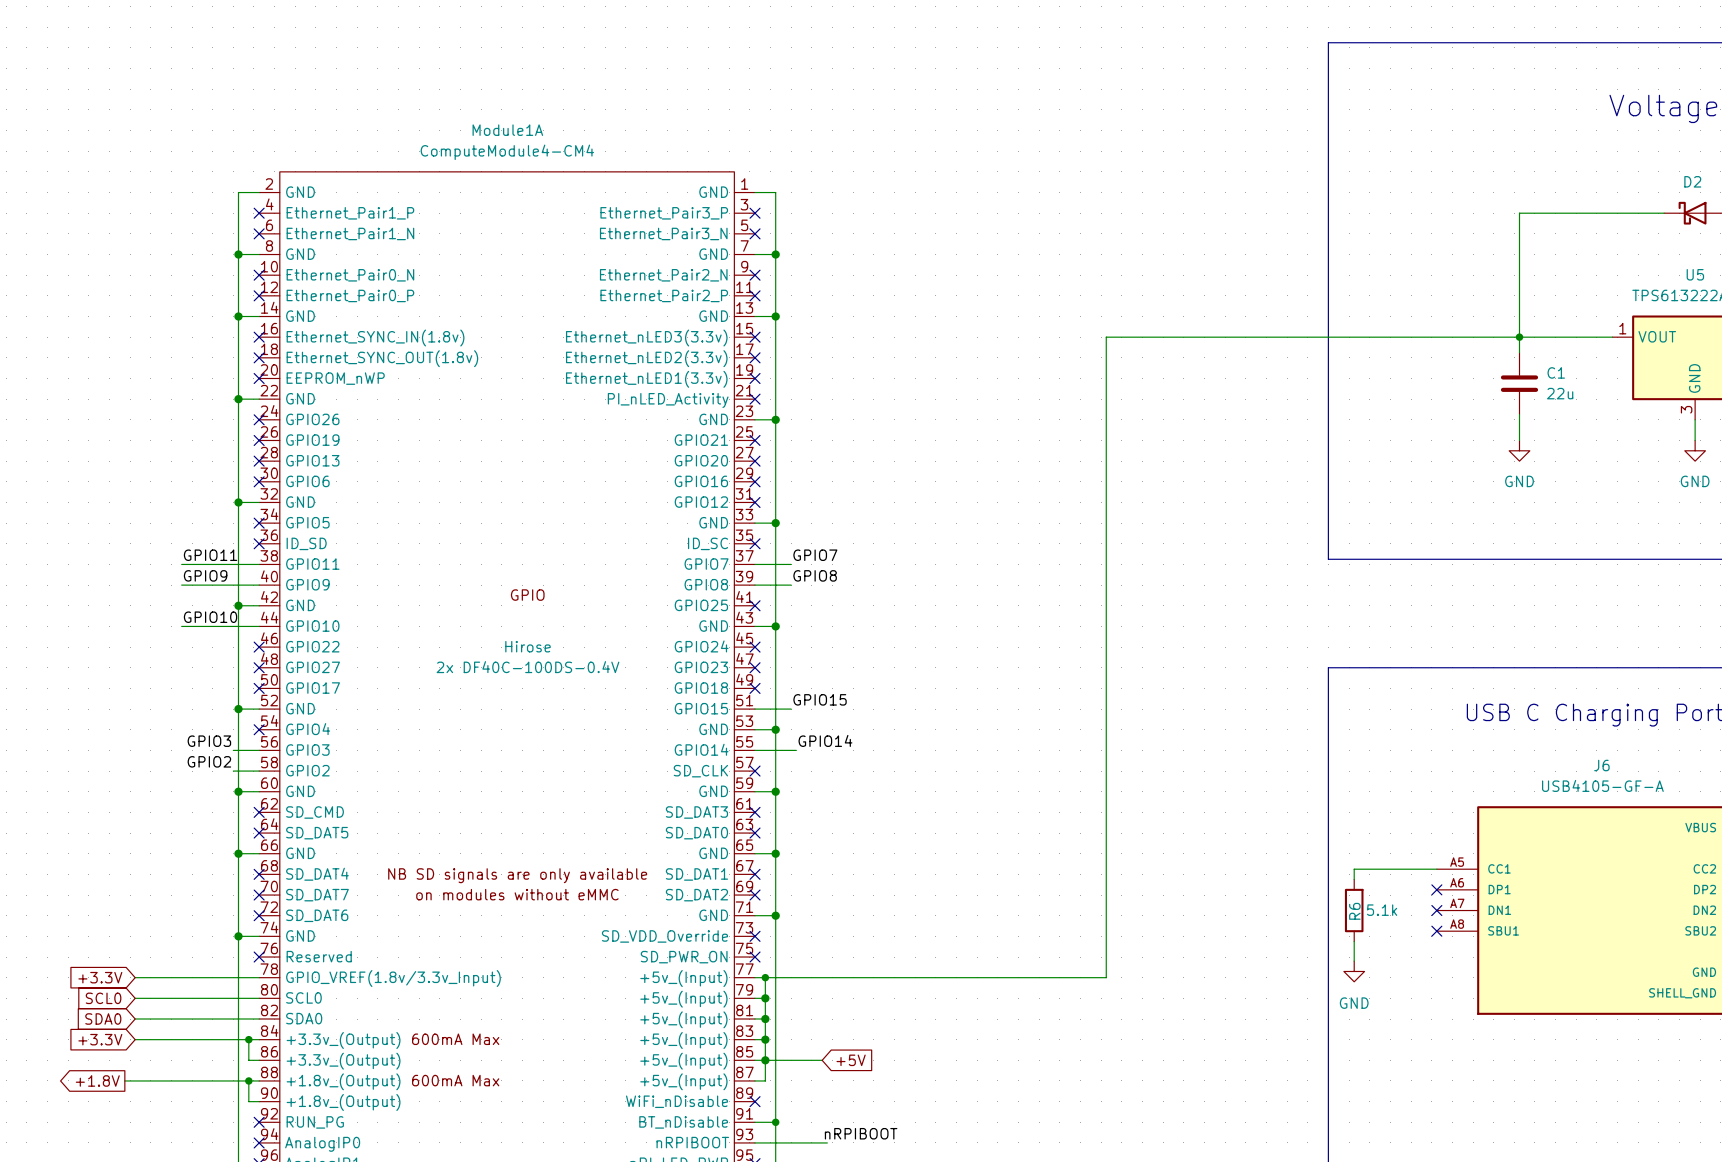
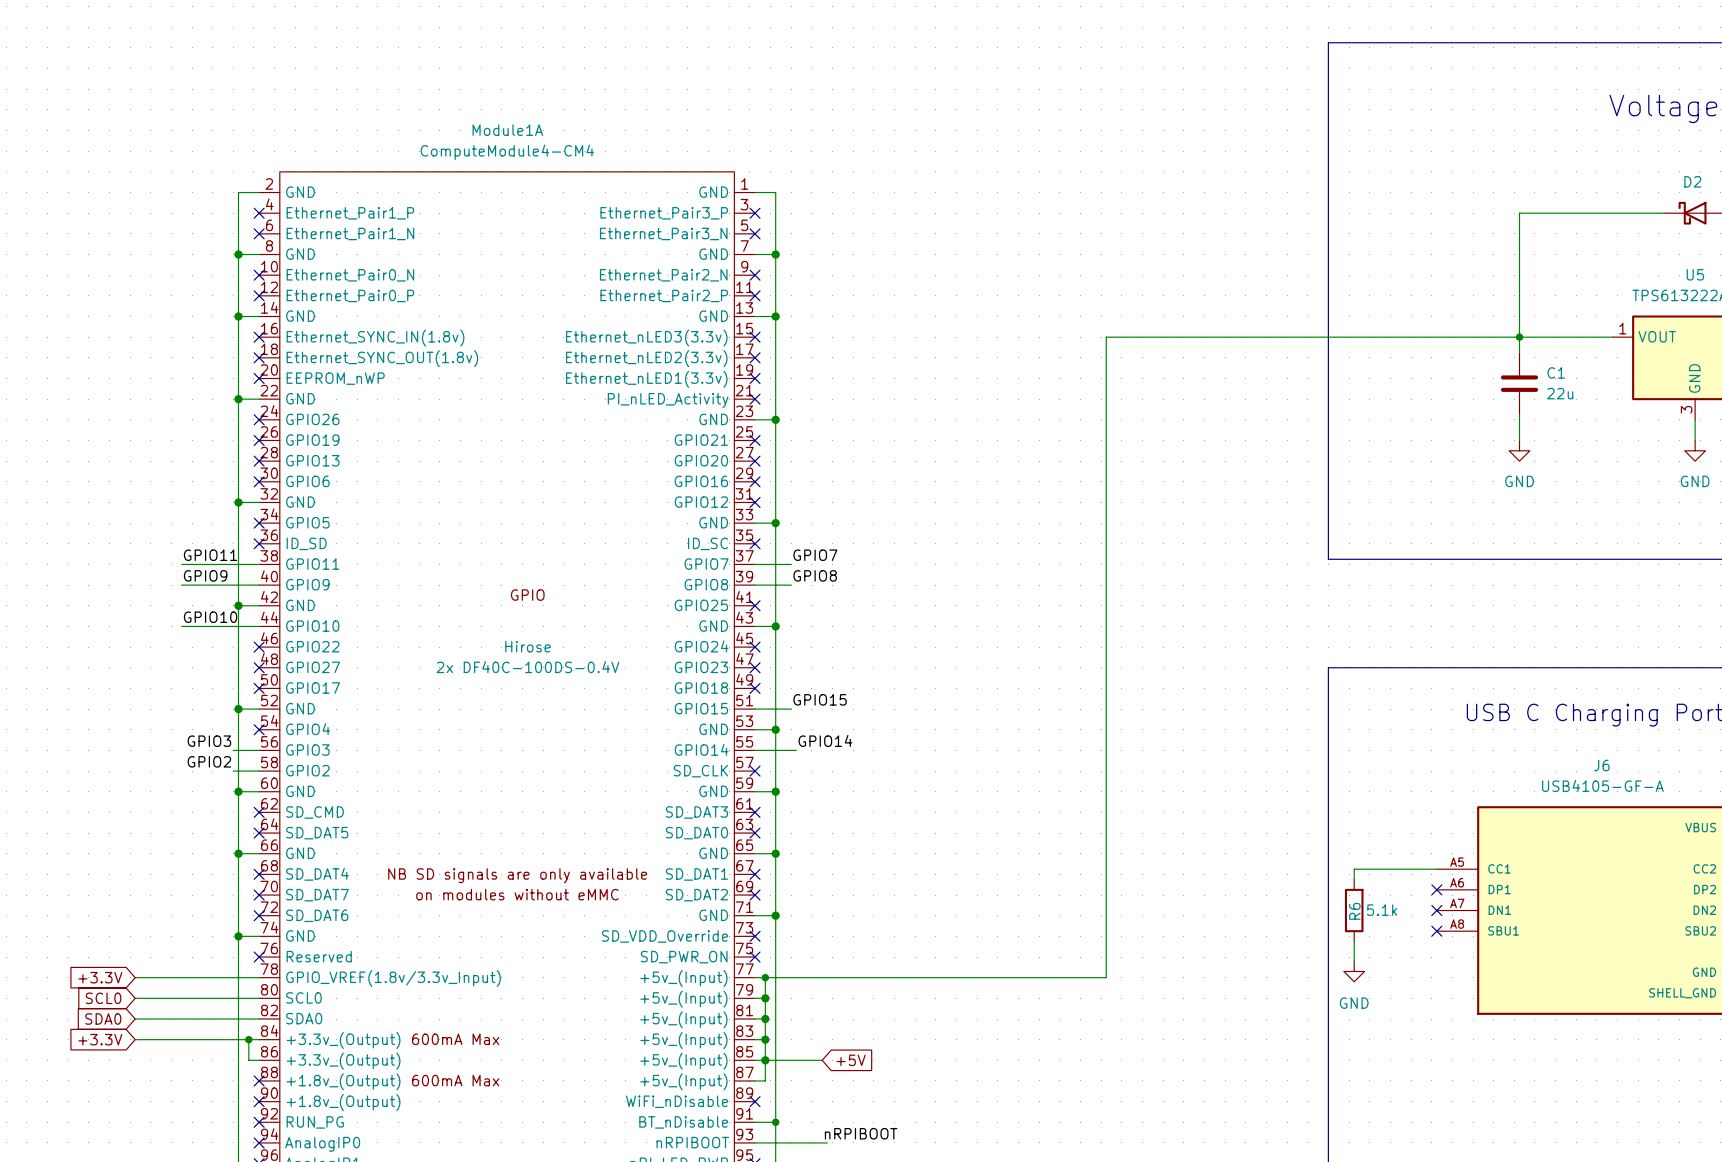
global label: +1.8V (97, 1080) -> none
wire: (124, 1080) (259, 1080) -> none
wire: (248, 1080) (248, 1101) (259, 1101) -> none
junction: (248, 1080) -> none
no-connect mark: none -> (259, 1080)
no-connect mark: none -> (259, 1101)

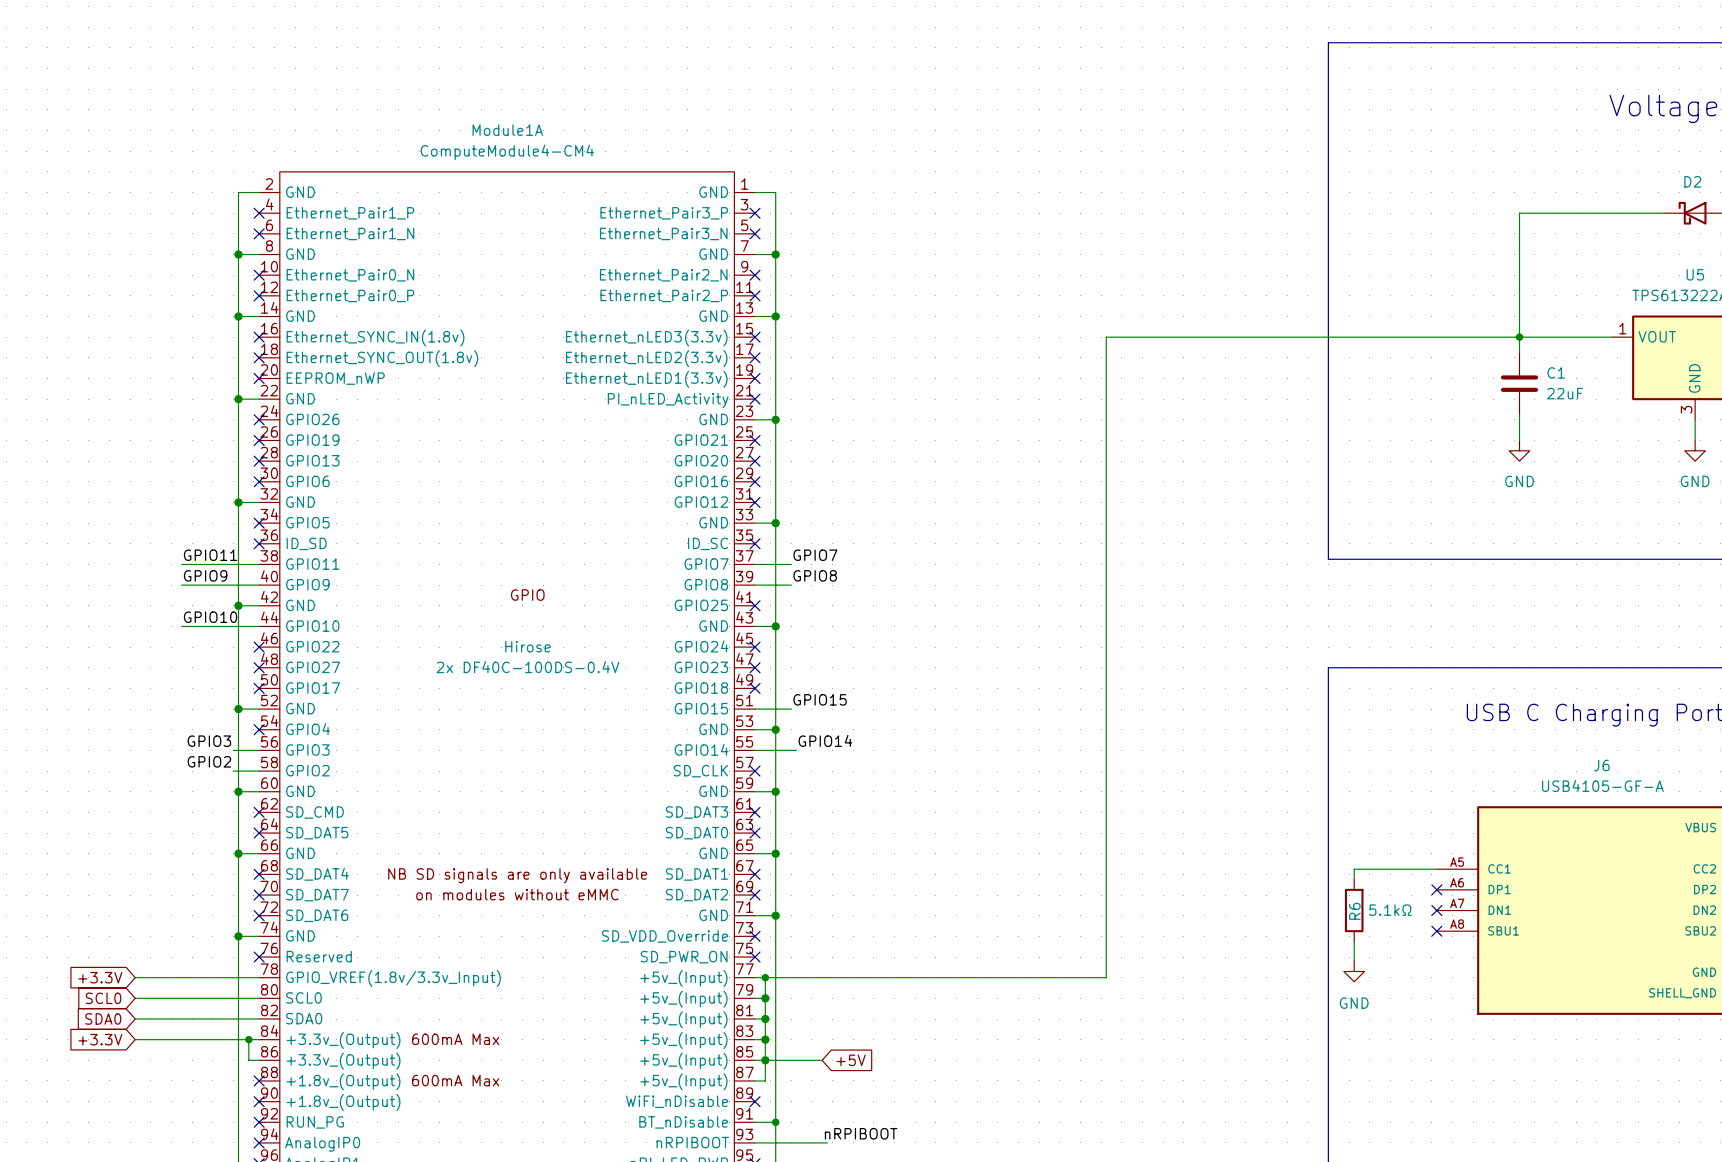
C1 value: 22u (1560, 393) -> 22uF (1565, 393)
R6 value: 5.1k (1382, 910) -> 5.1kΩ (1390, 910)

